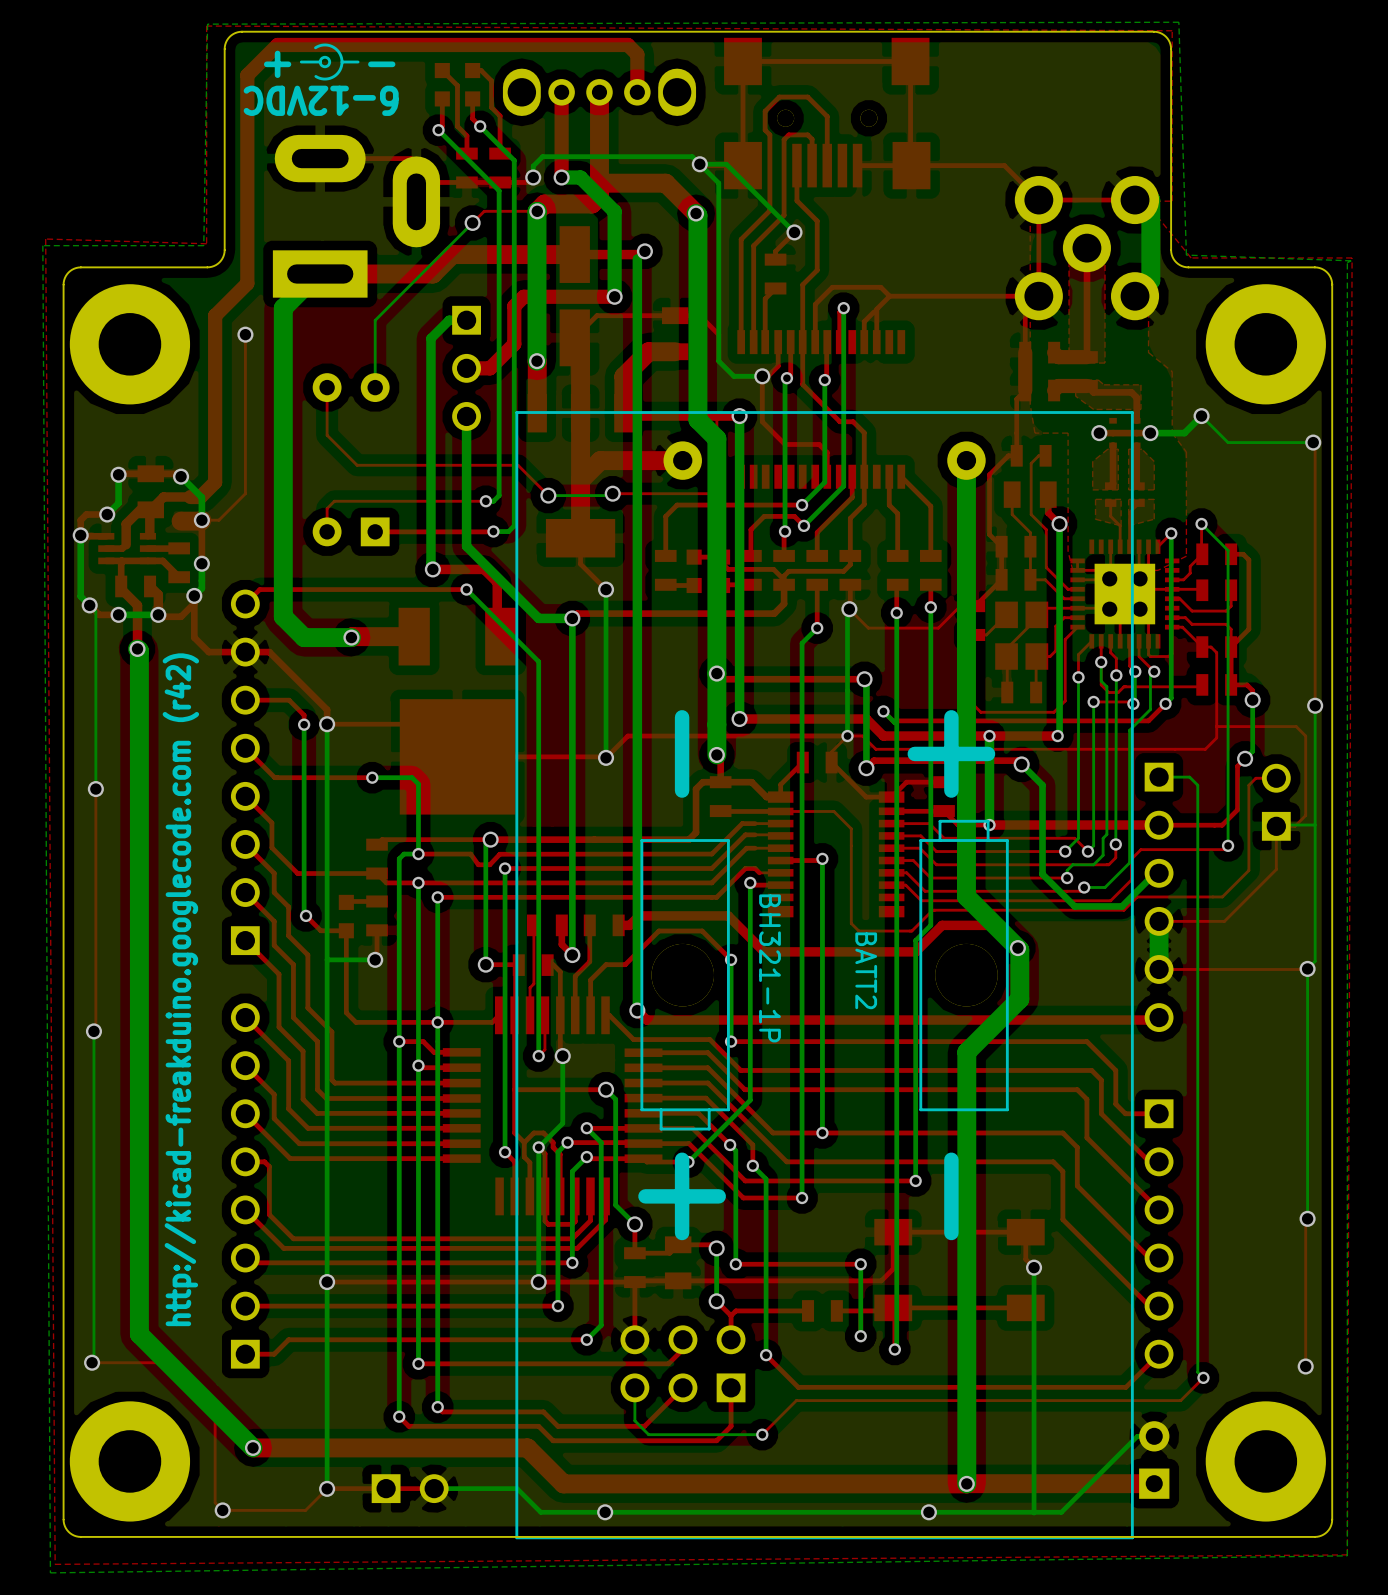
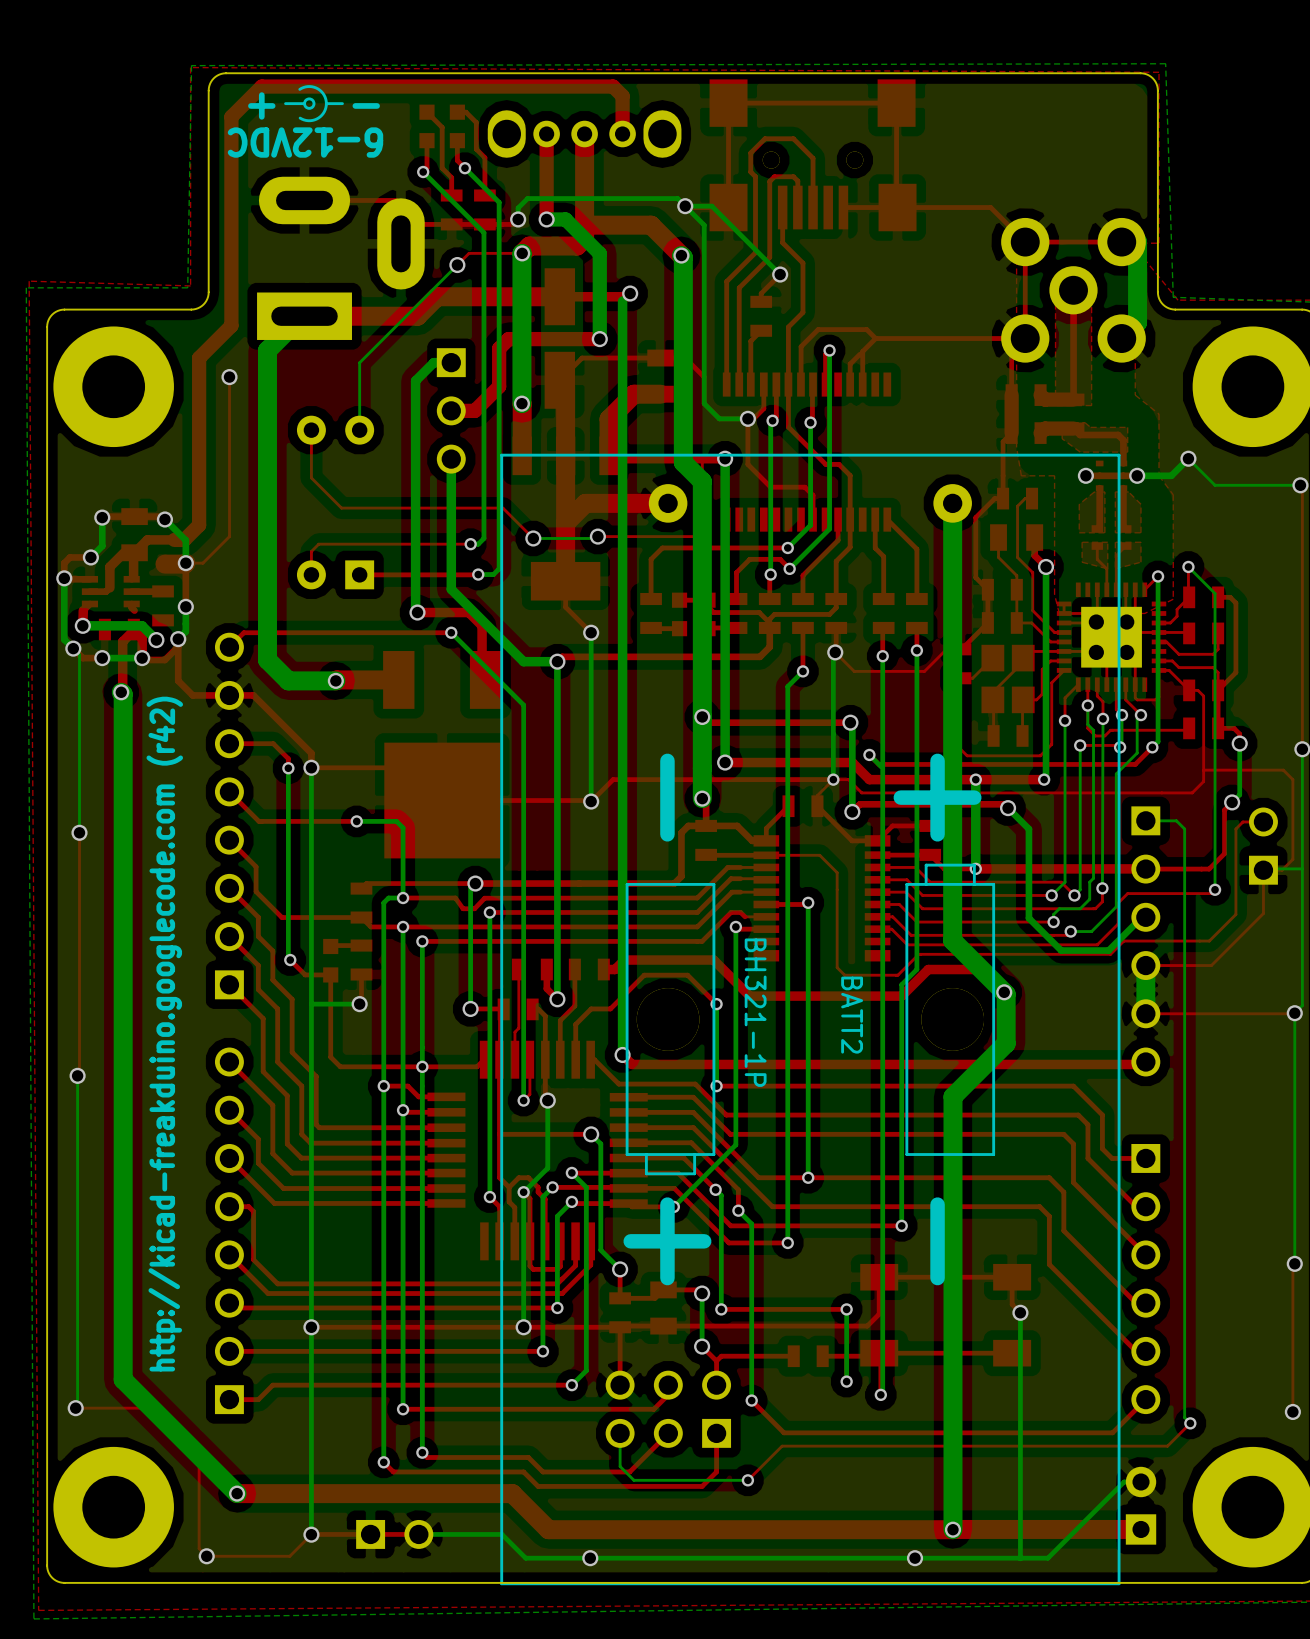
top track: (106, 560) (162, 560) (179, 577) -> (89, 603) (83, 610) (82, 625)
top track: none -> (131, 603) (134, 610)
top track: (122, 561) (121, 589) (137, 605) (137, 648) -> (134, 629) (122, 641) (121, 692)
bottom track: none -> (82, 625) (142, 625) (156, 640)
via: none -> (82, 625)
via: none -> (156, 640)

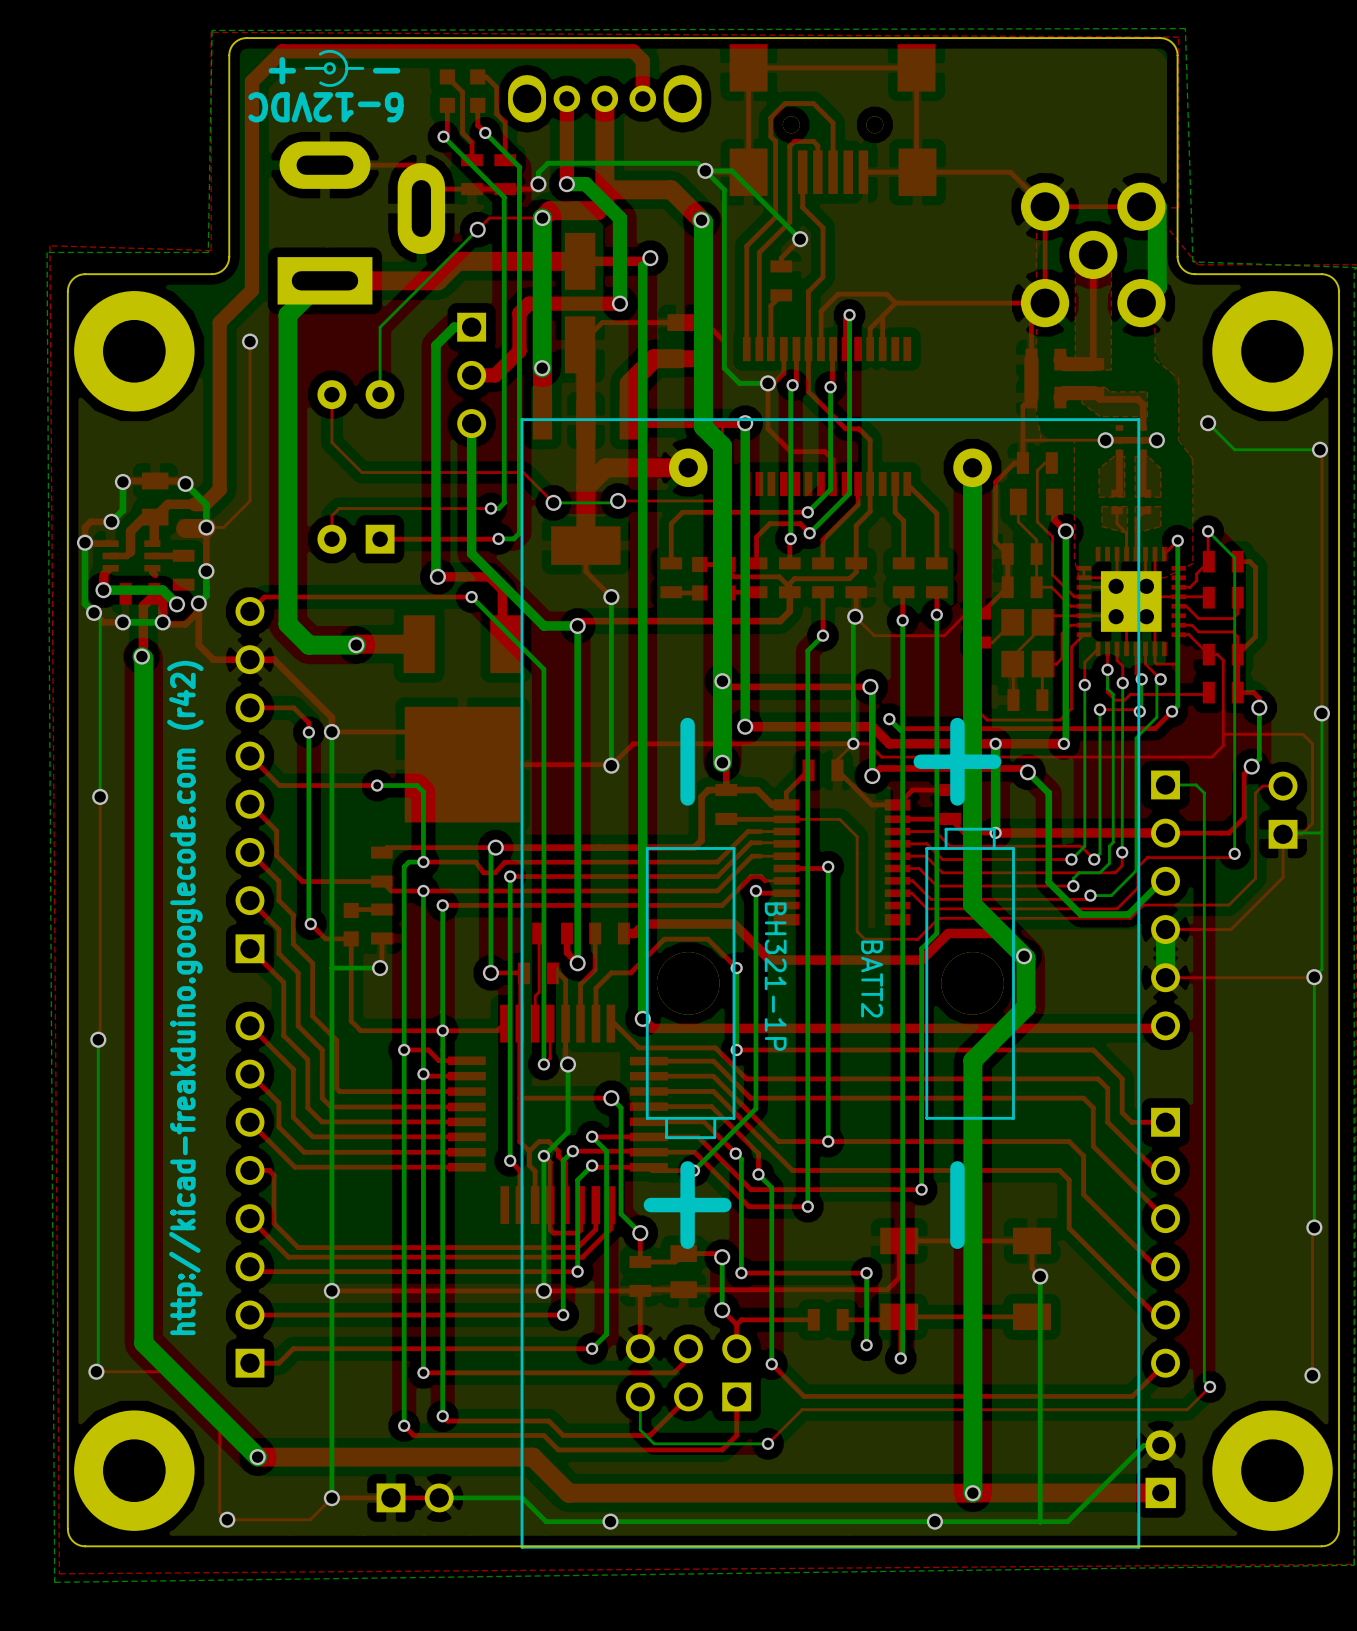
bottom track: (1188, 458) (1171, 475) (1137, 475) -> none
top track: none -> (1105, 440) (1022, 440)

